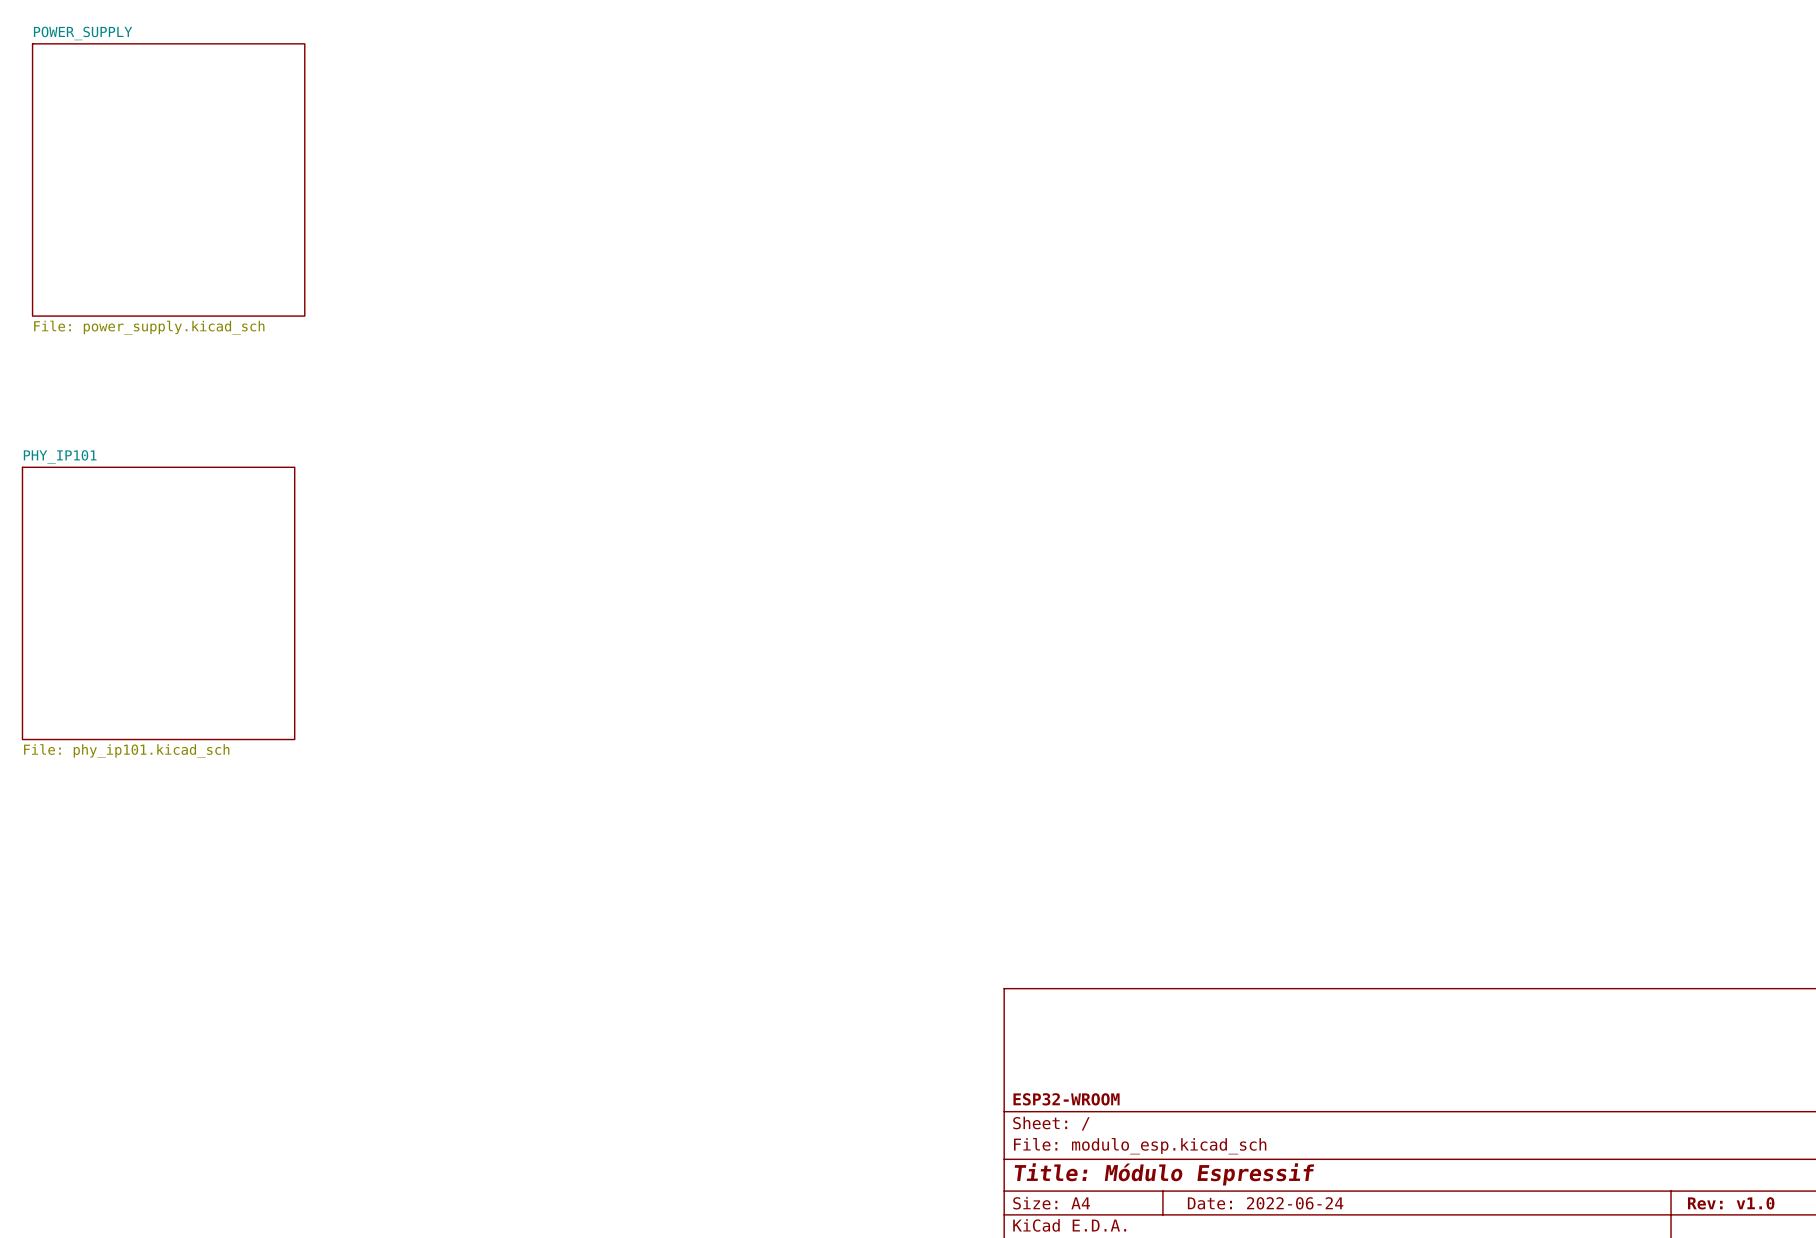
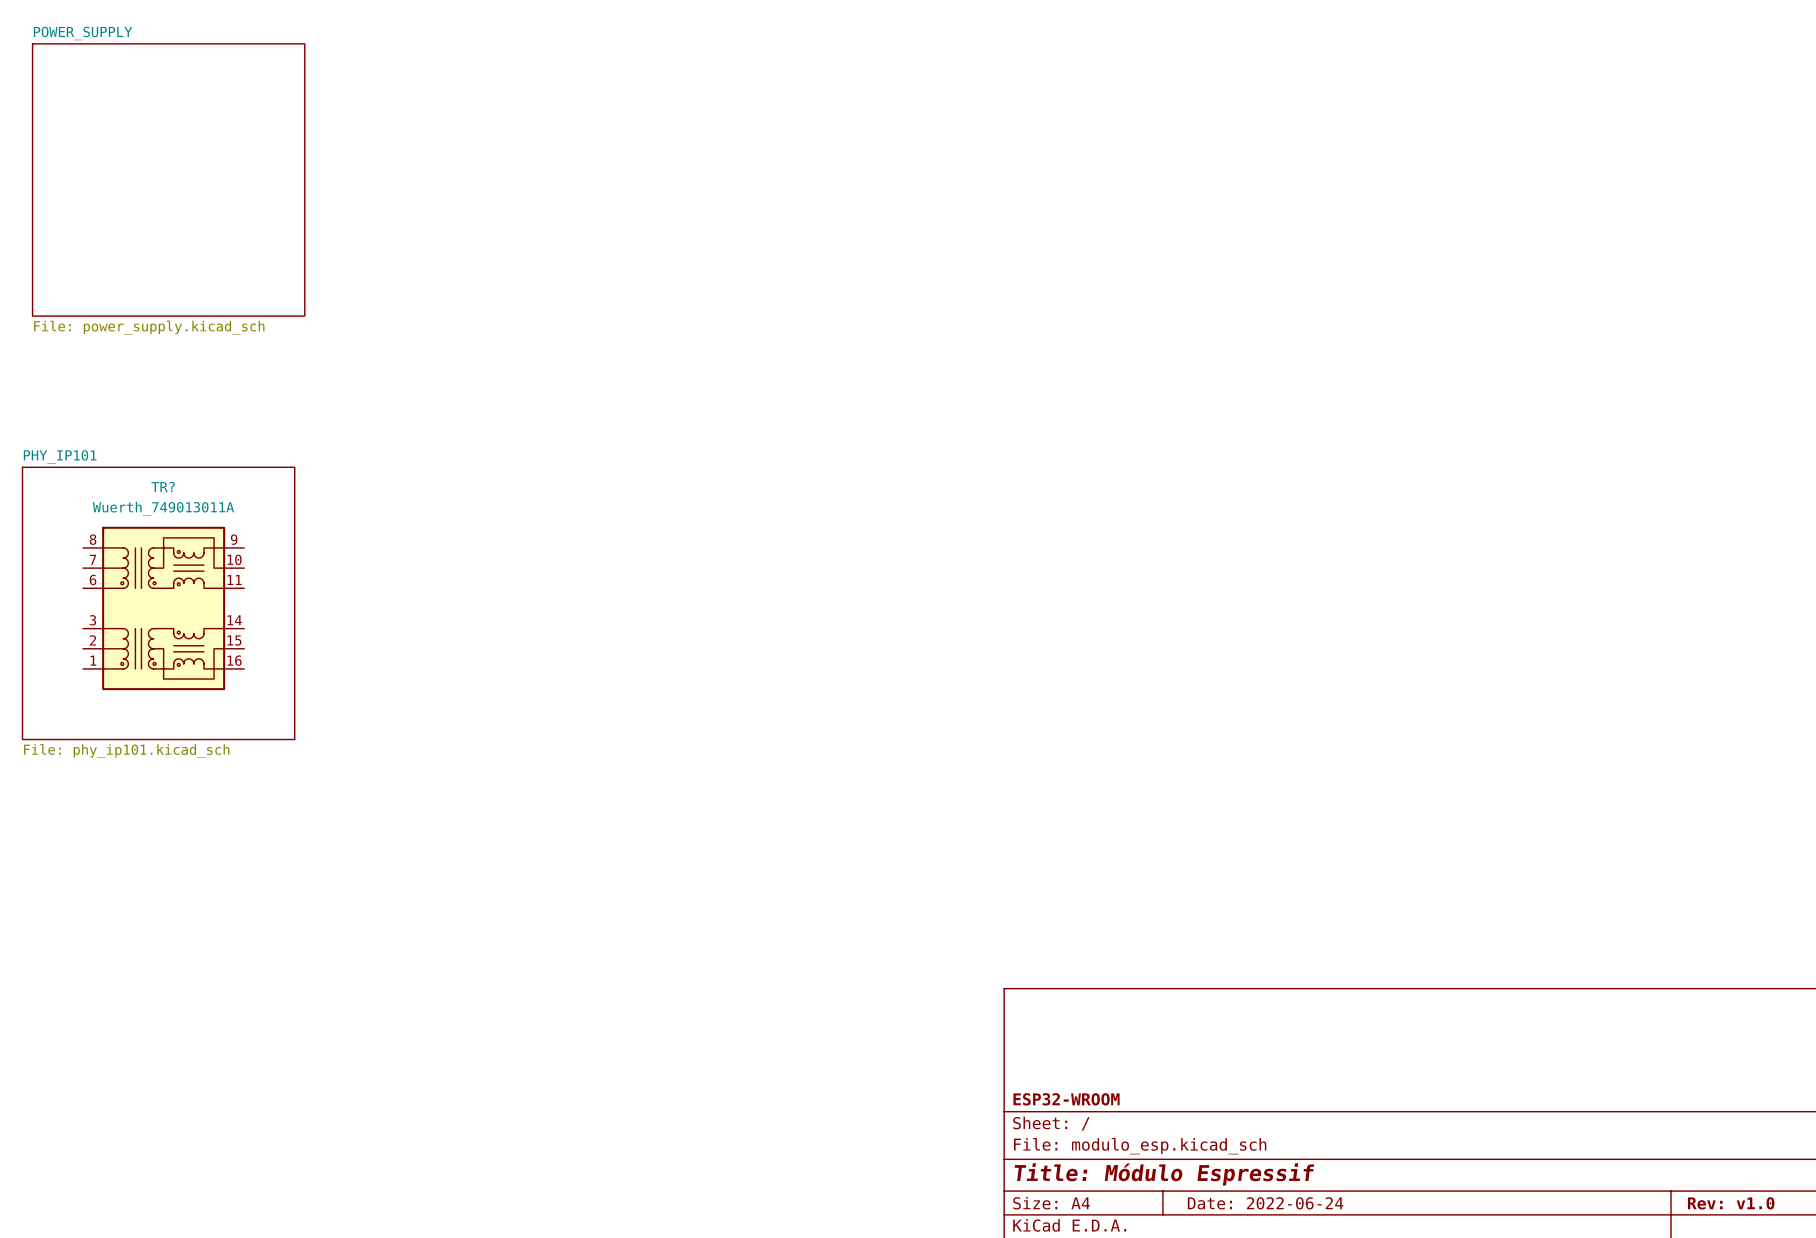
TR?: none -> Wuerth_749013011A (163, 608)

